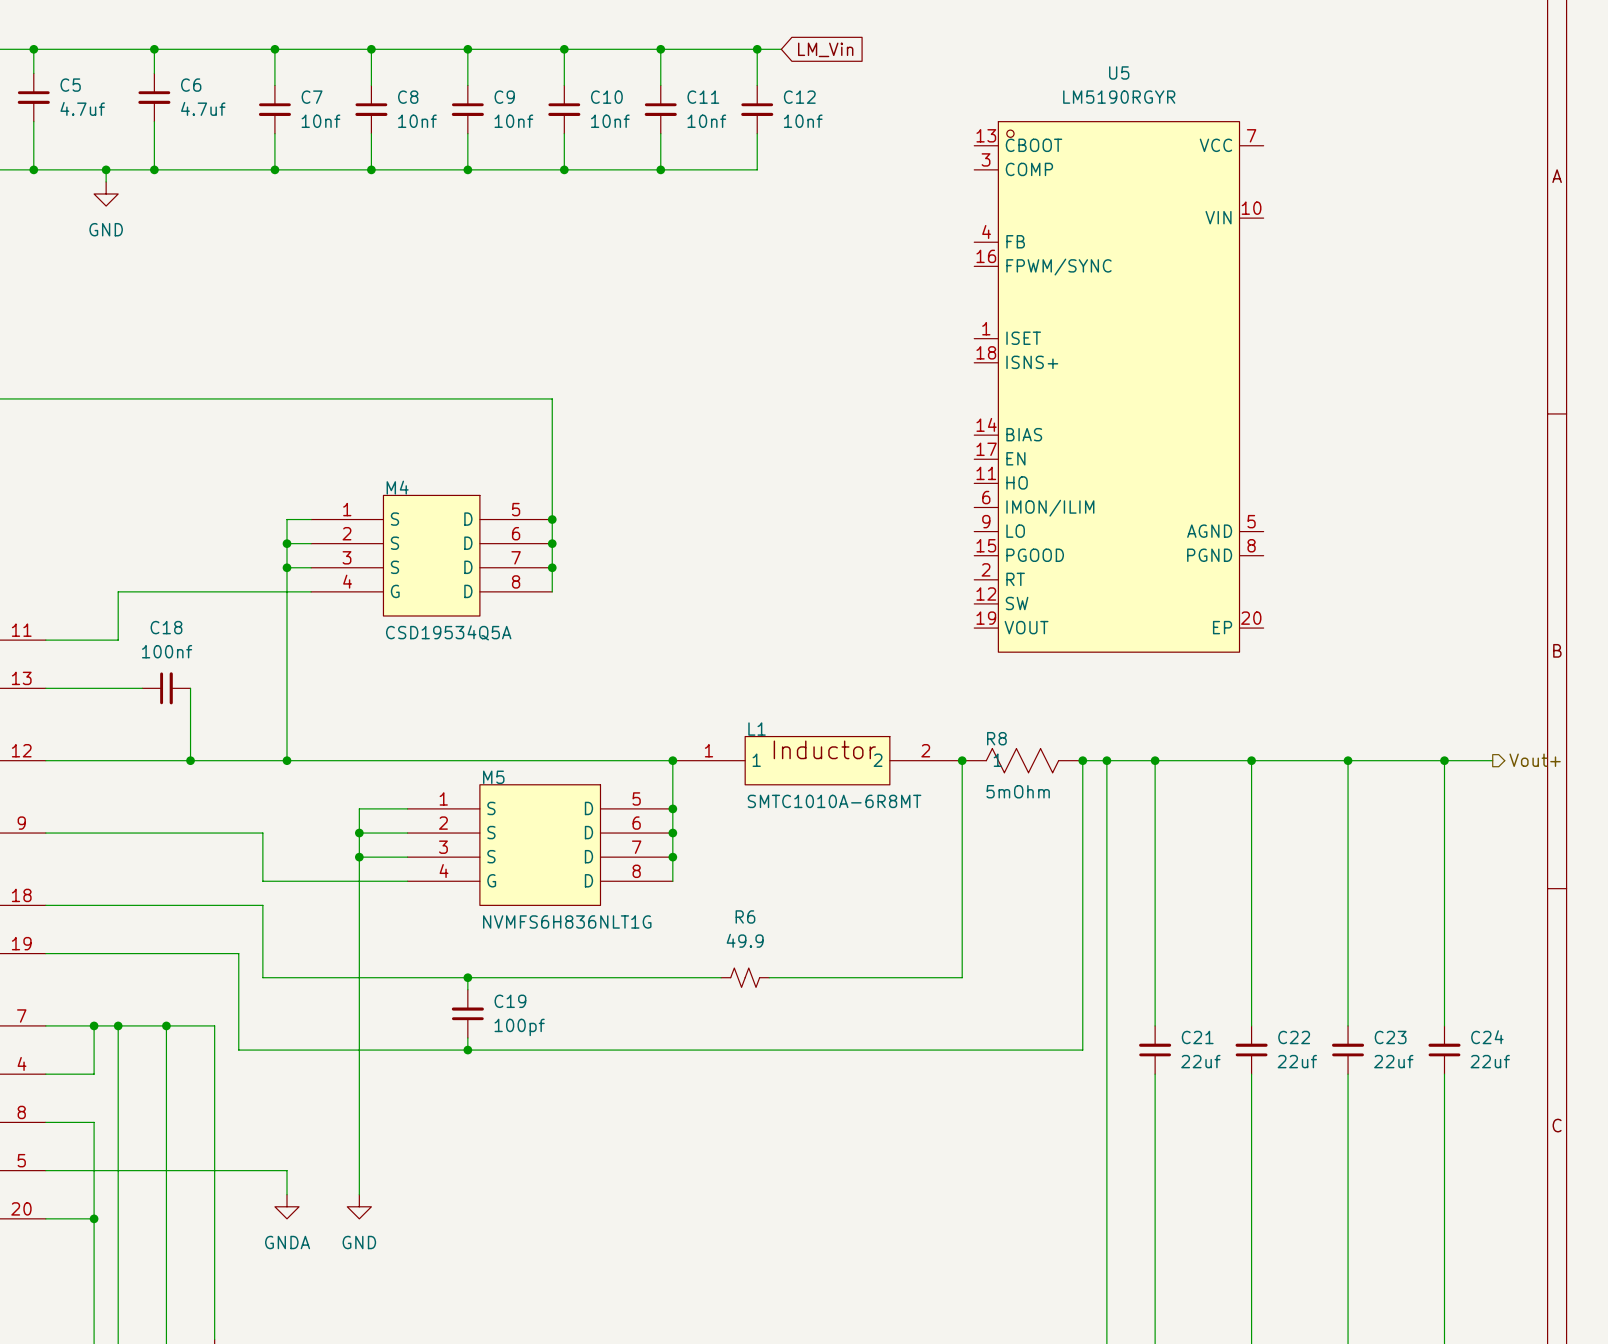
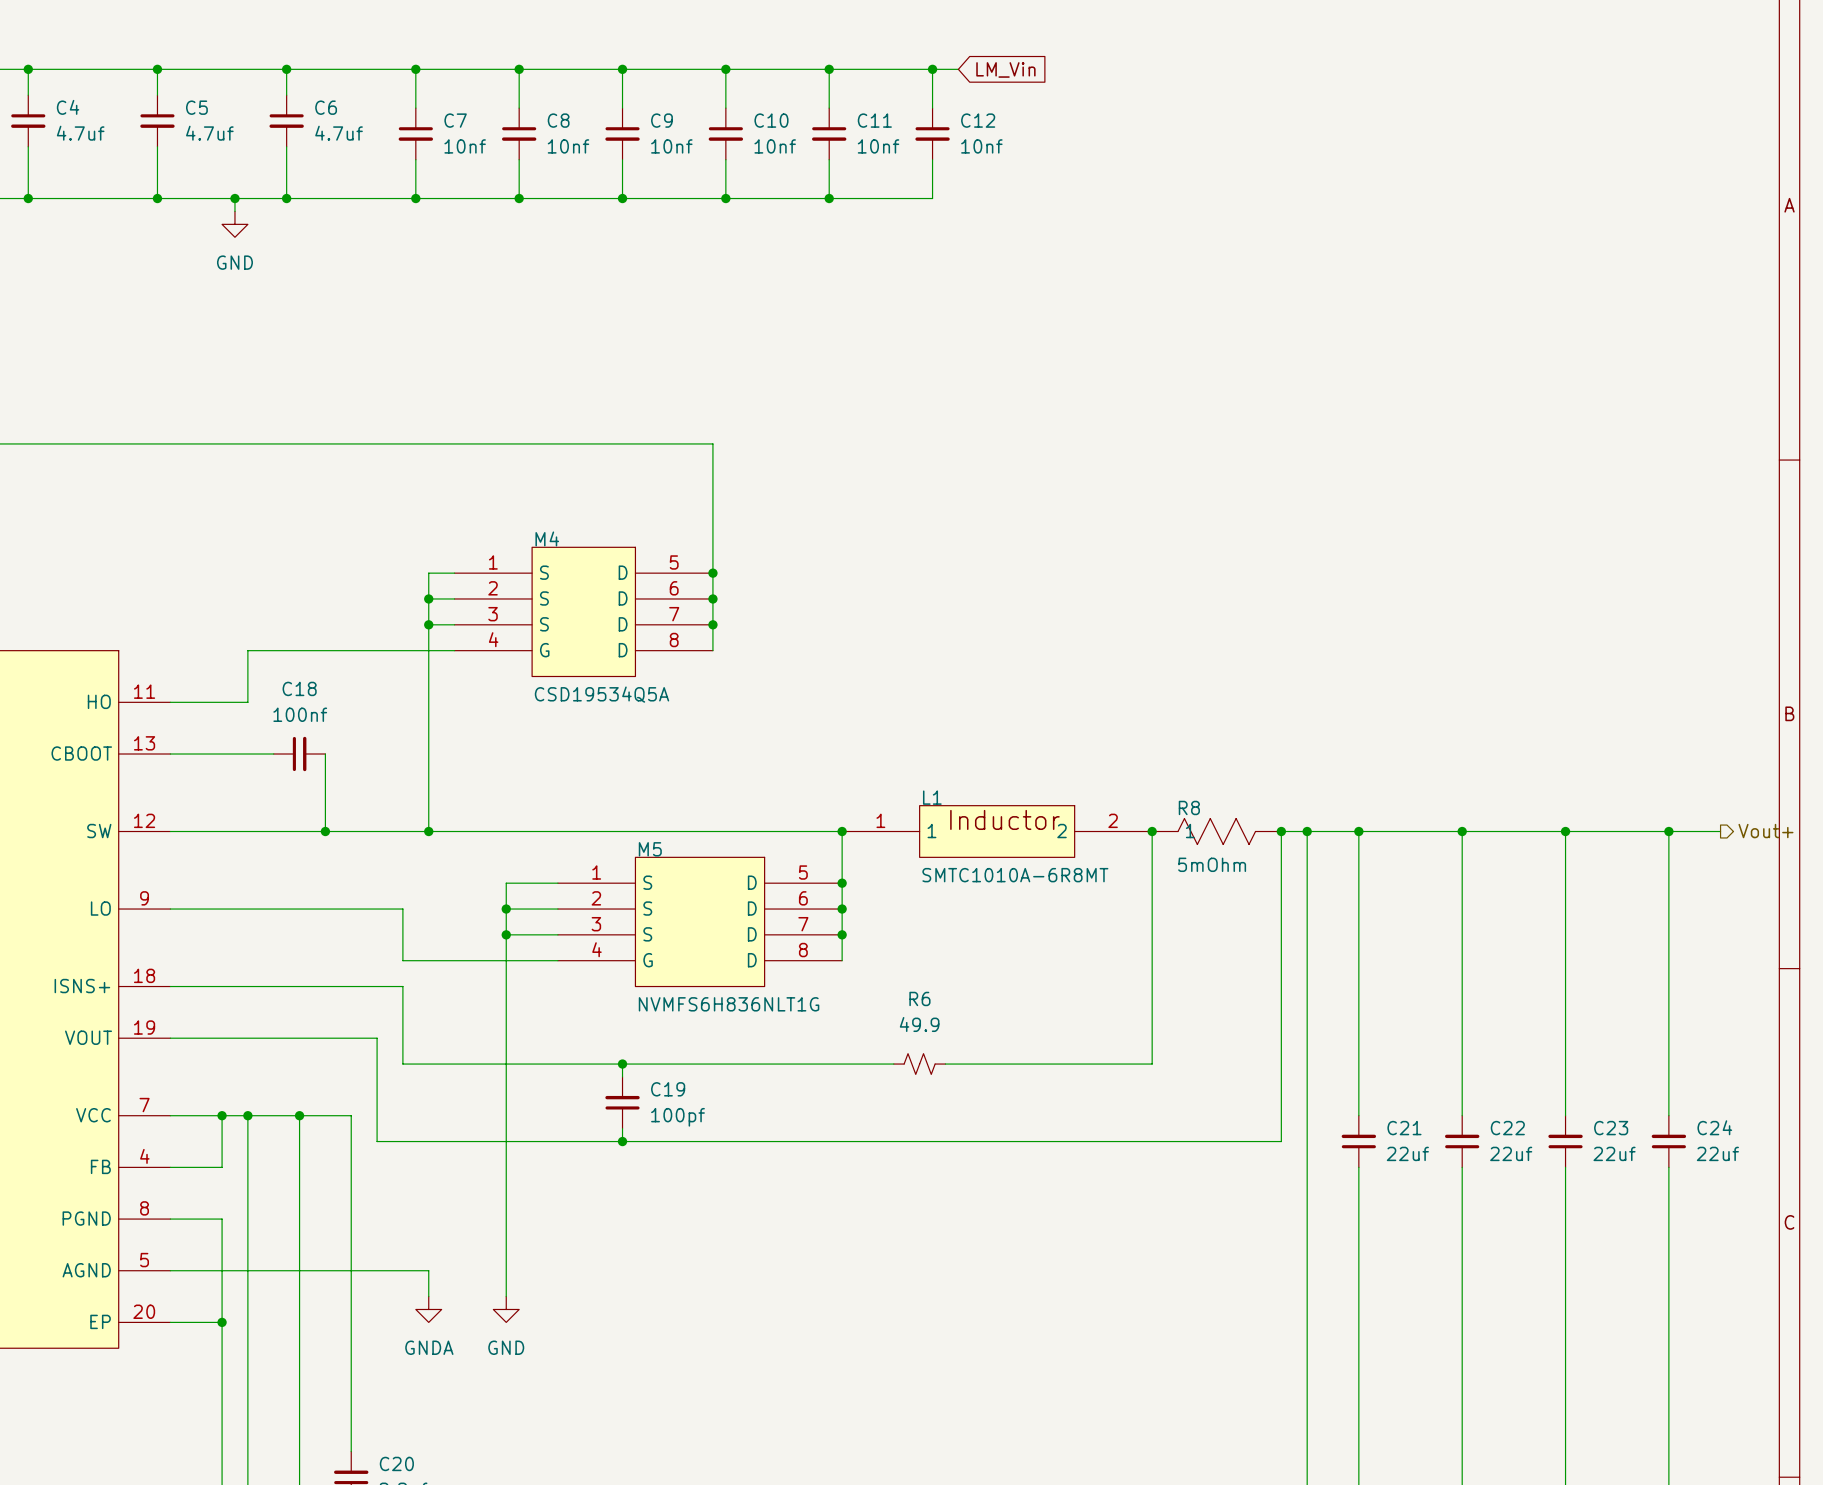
U5: LM5190RGYR (1118, 386) -> none

